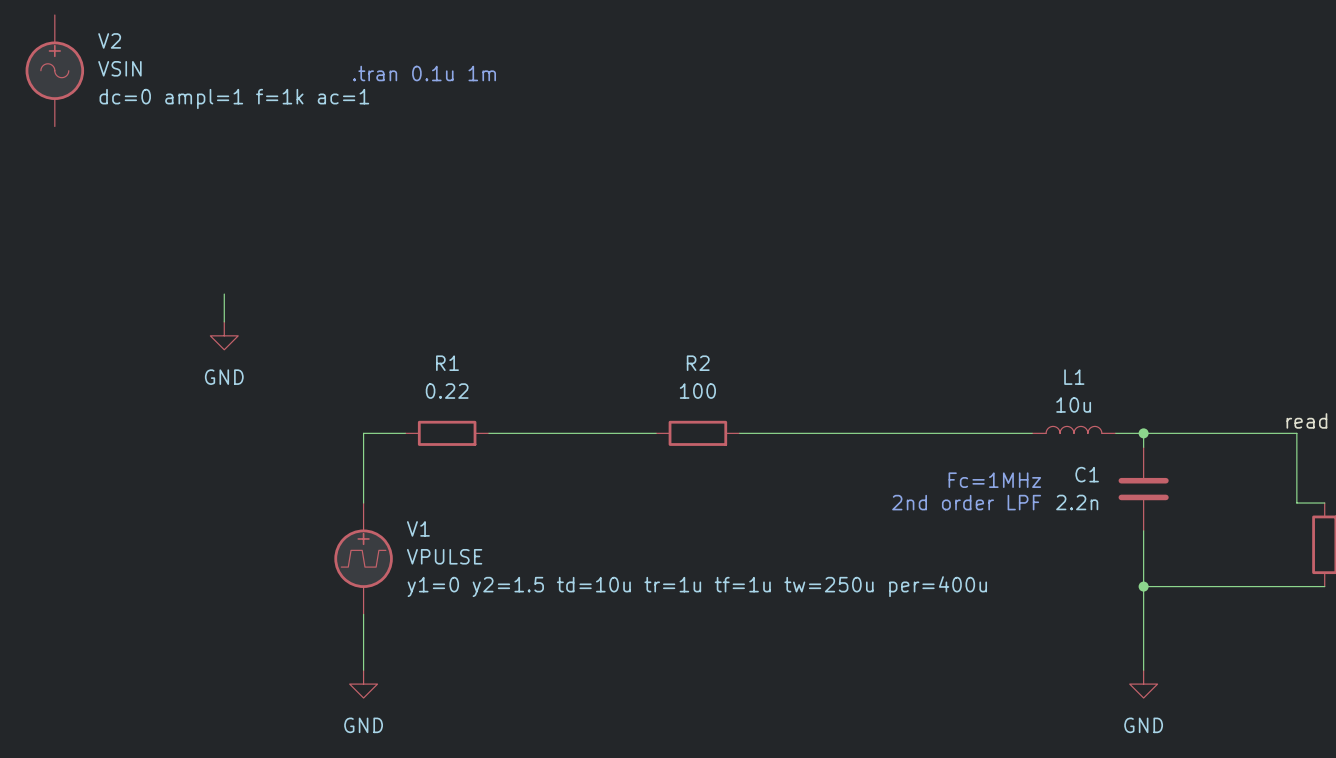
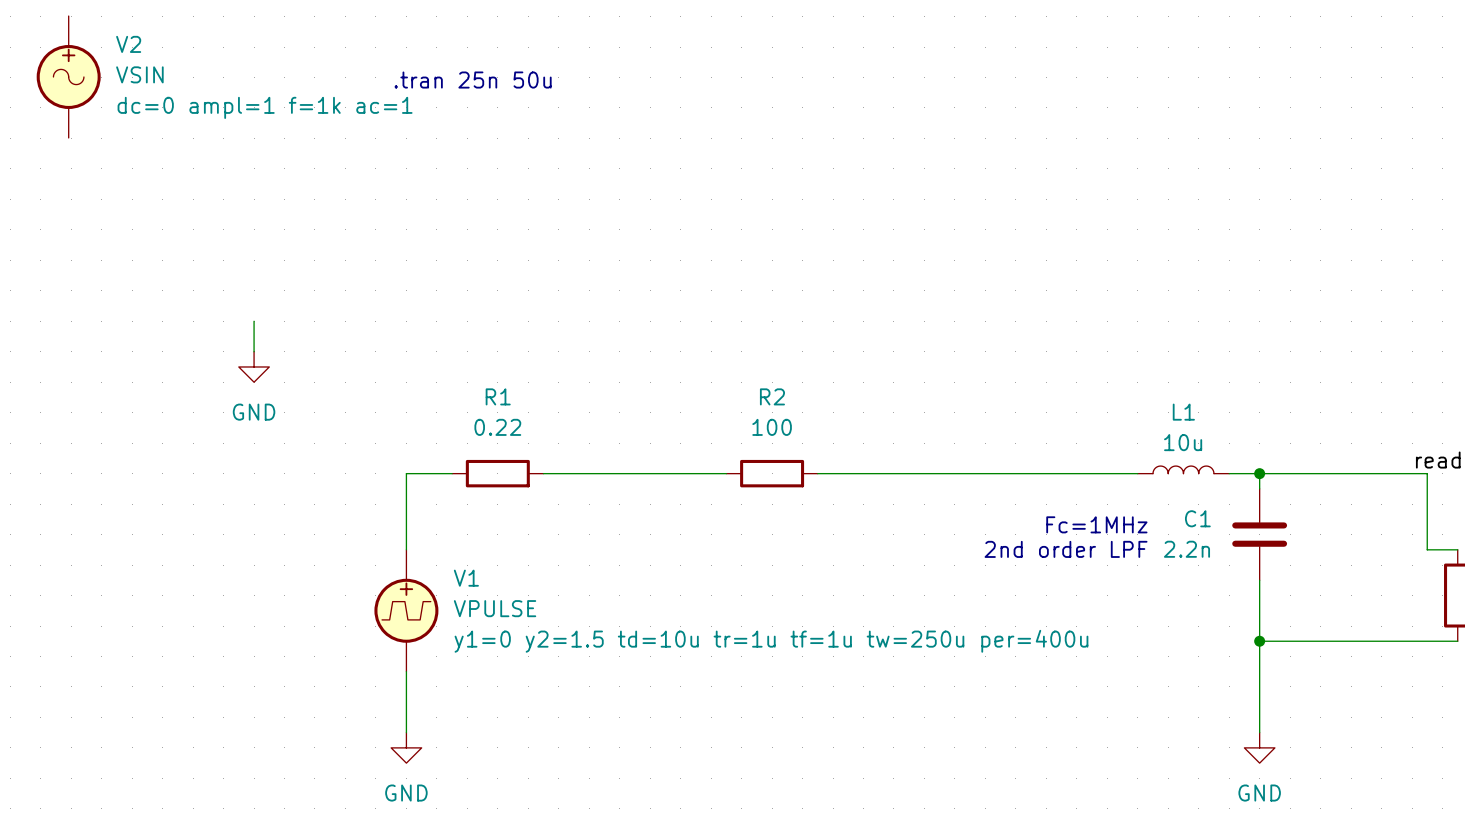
text: .tran 0.1u 1m (424, 73) -> .tran 25n 50u (473, 80)

